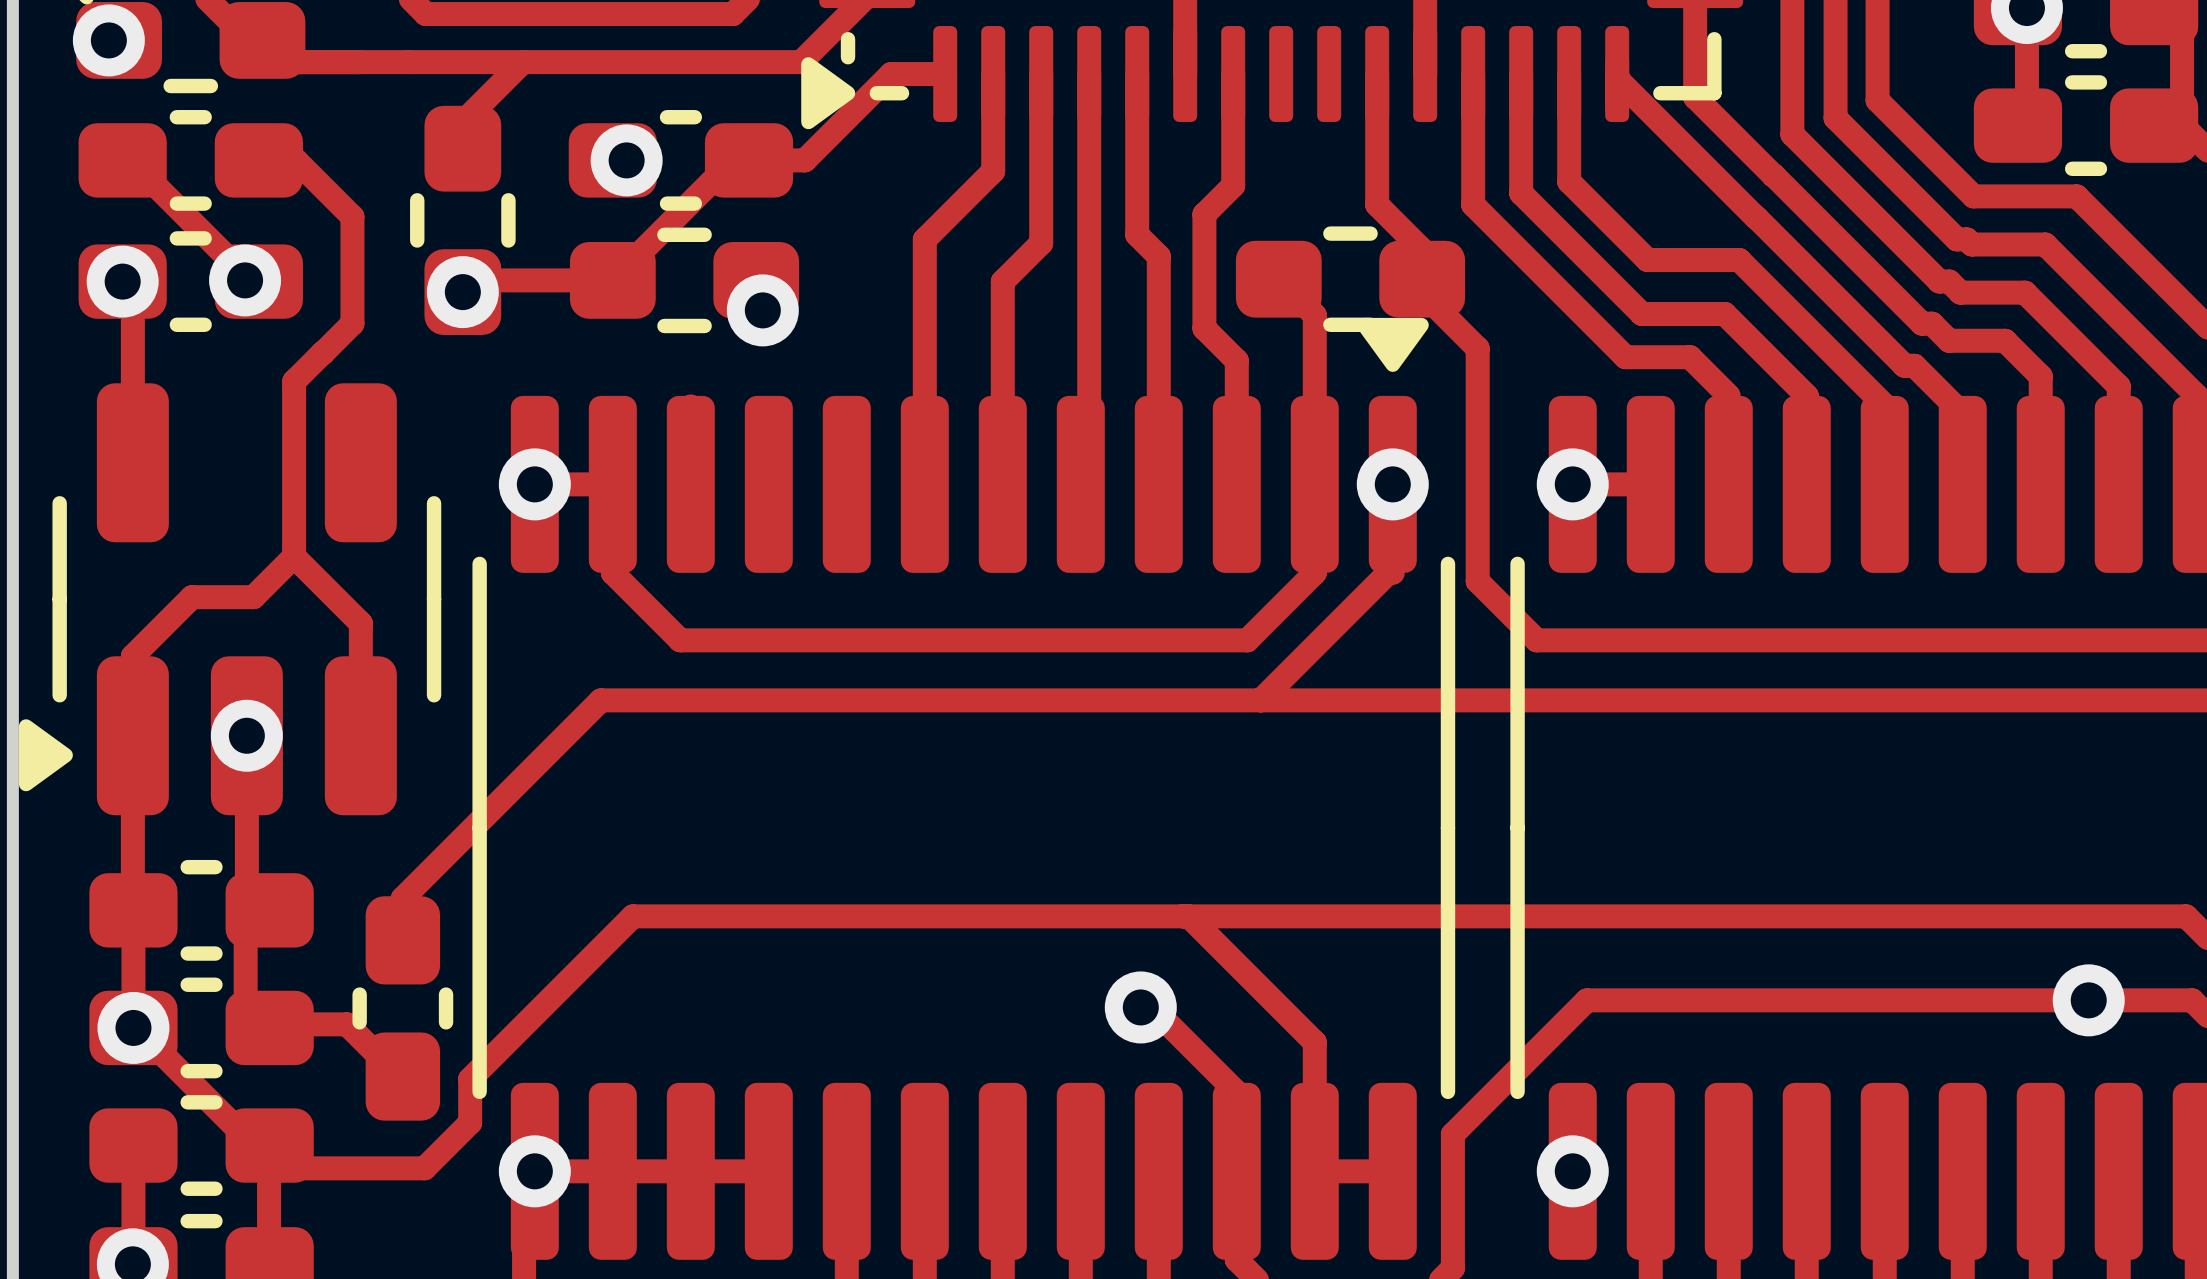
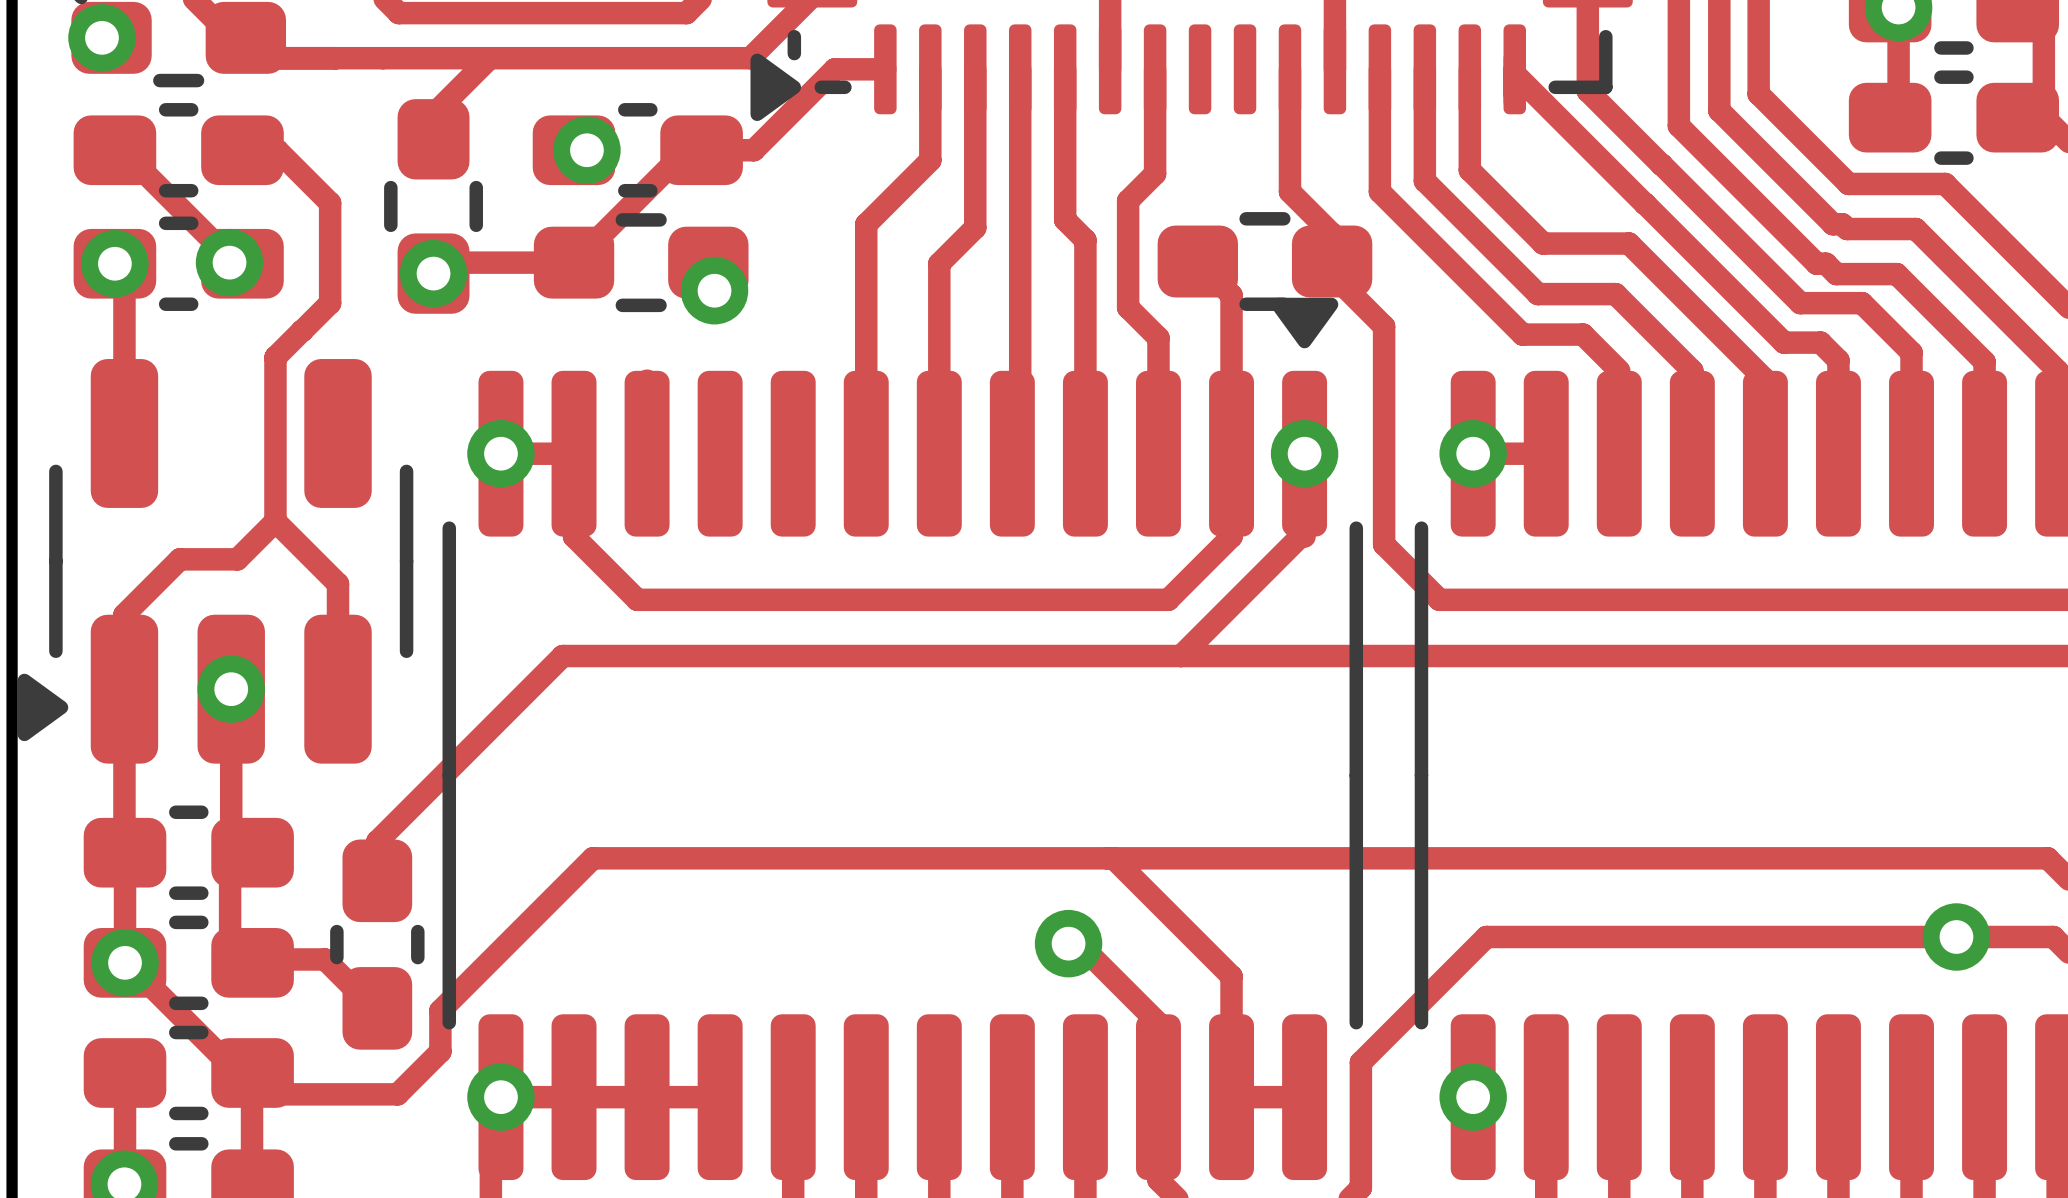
track: (1931, 323) (1949, 340) (2005, 340) -> (1809, 303) (1862, 303) (1878, 319)
track: (1914, 365) (1962, 413) -> (1793, 342) (1820, 342) (1838, 360) (1838, 387)

